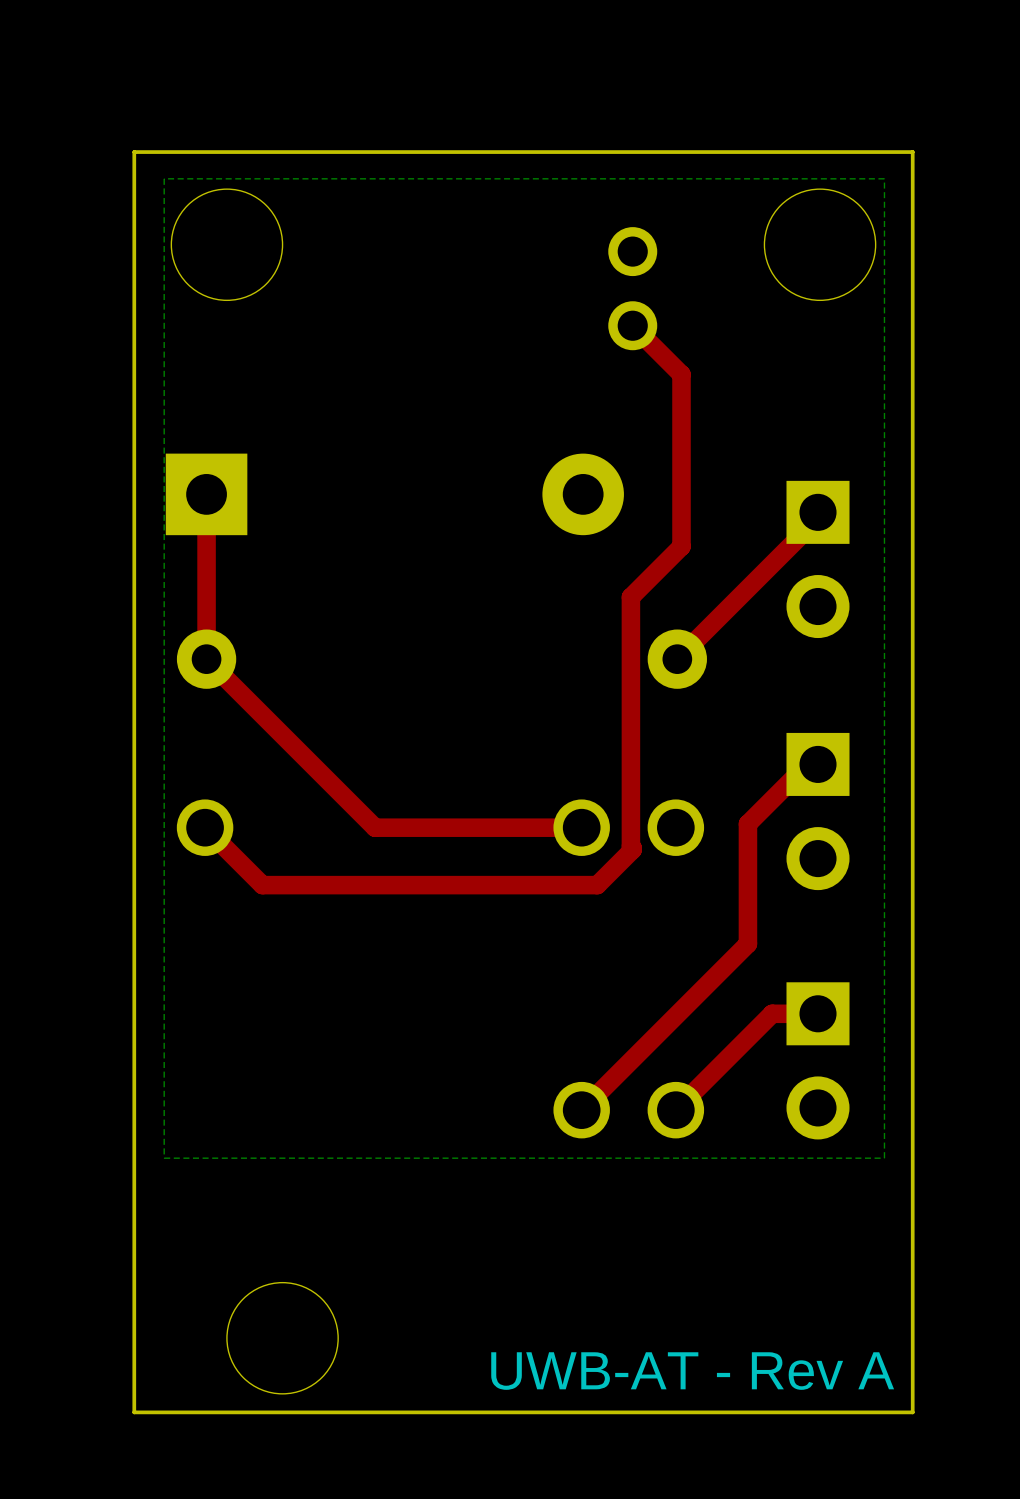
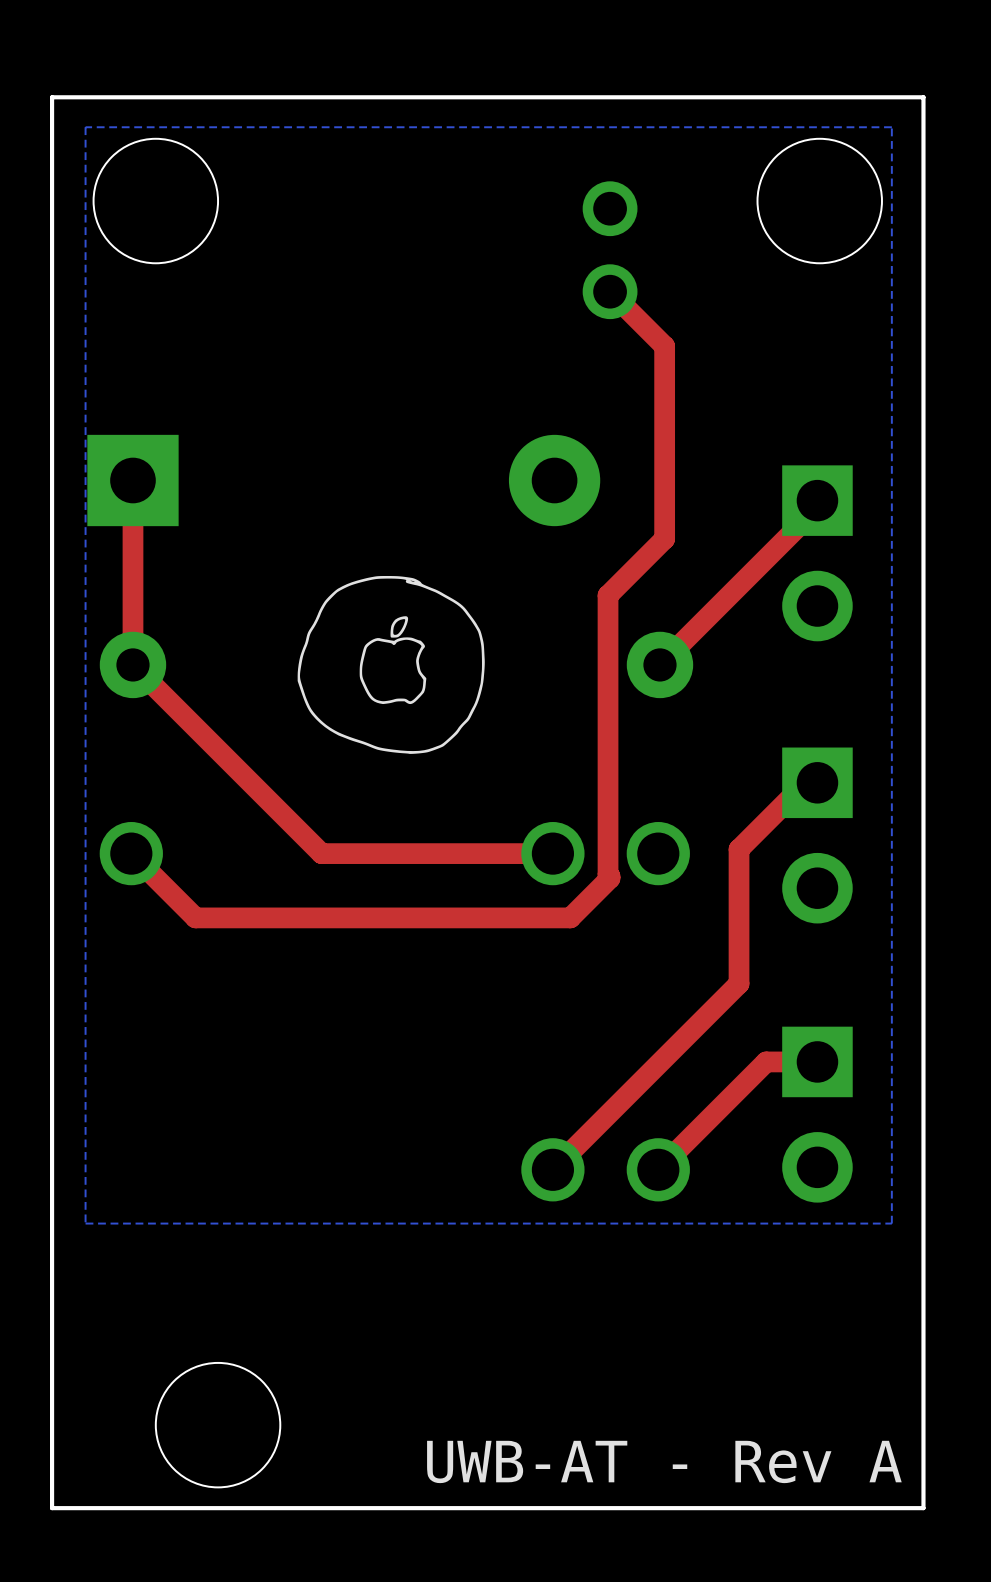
drawing: none -> [297, 575, 485, 754]

